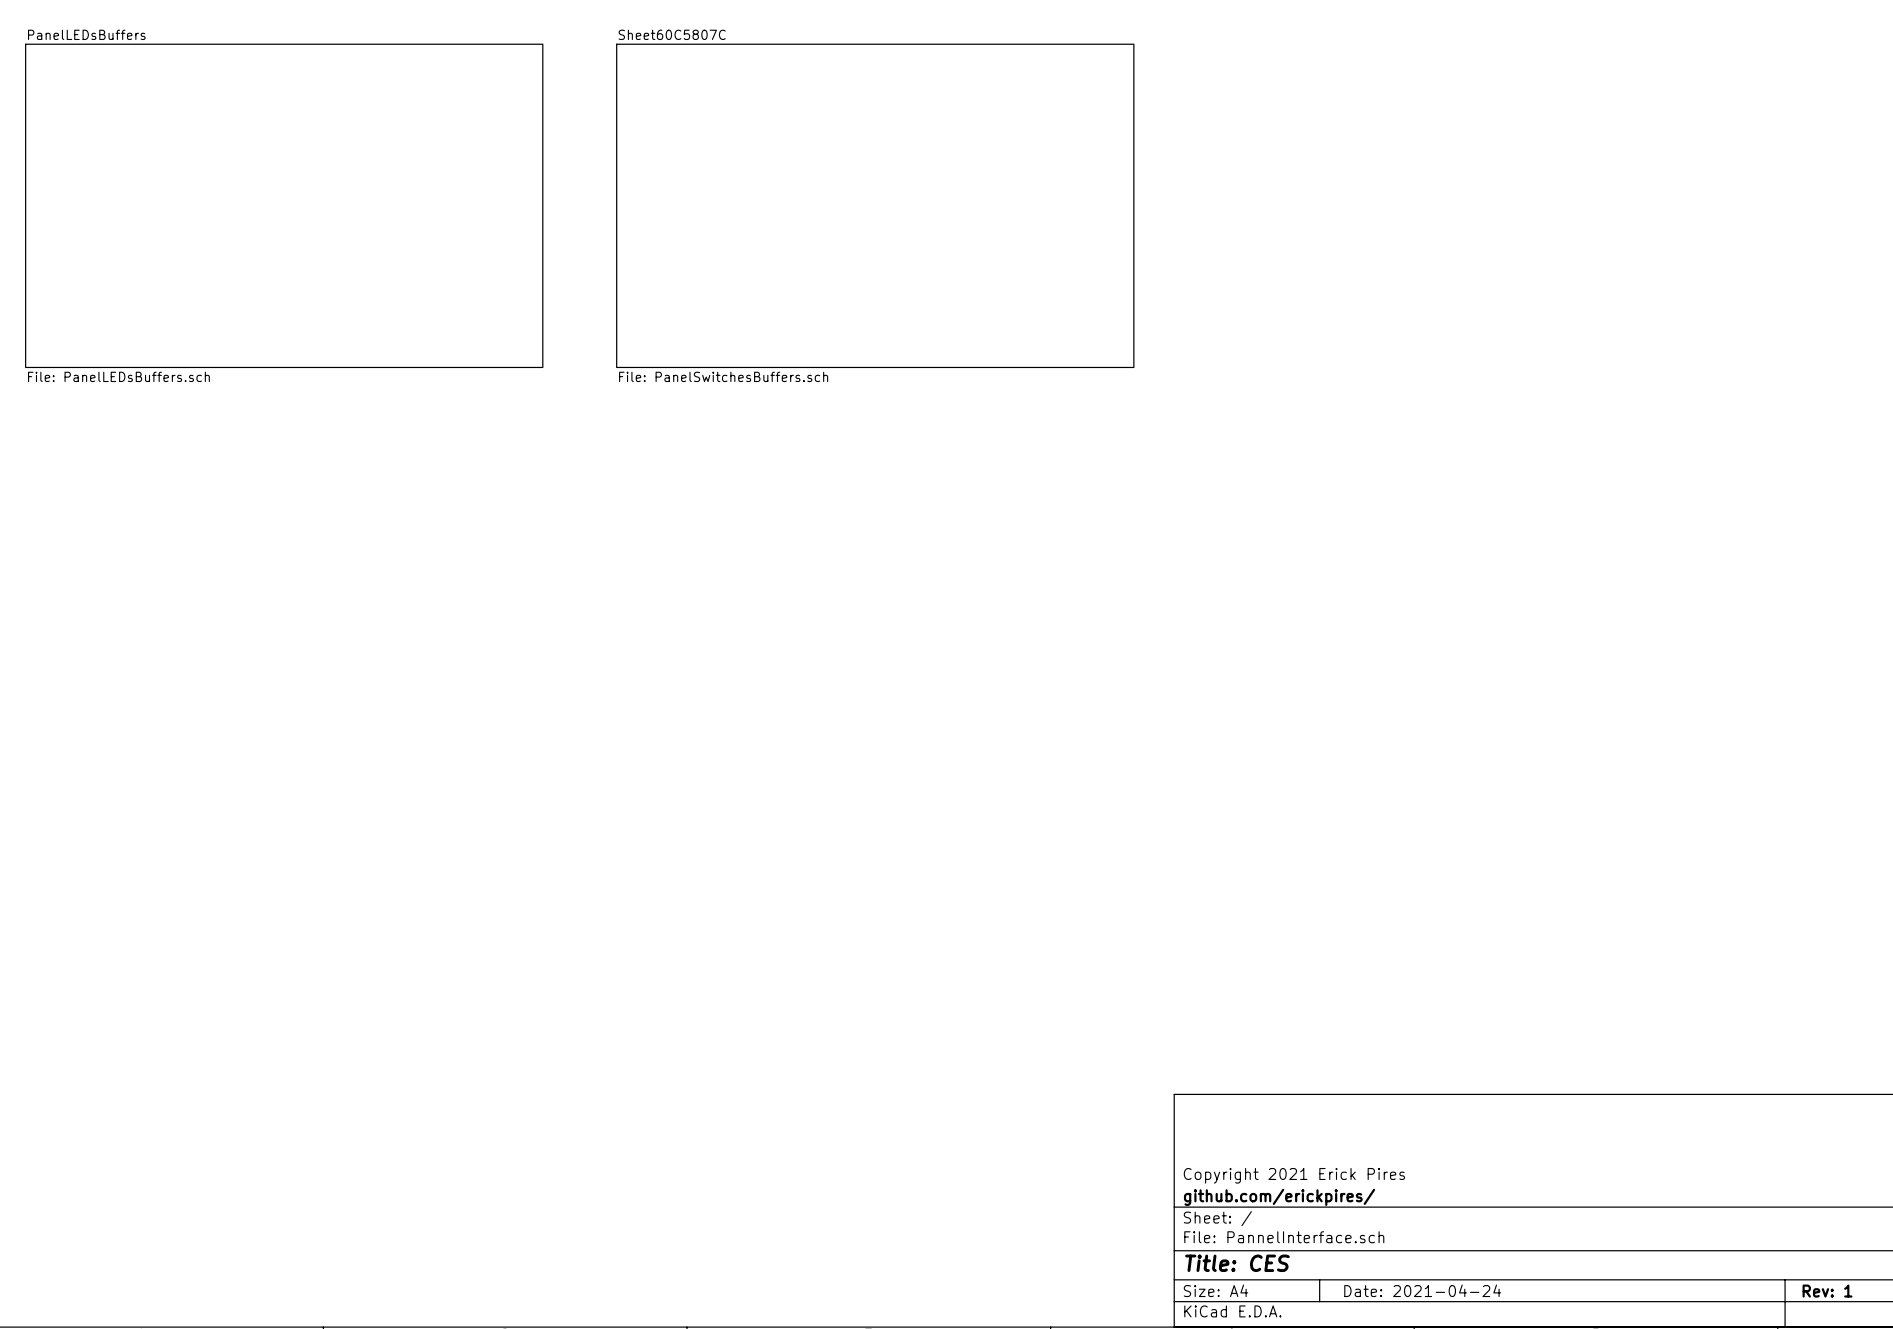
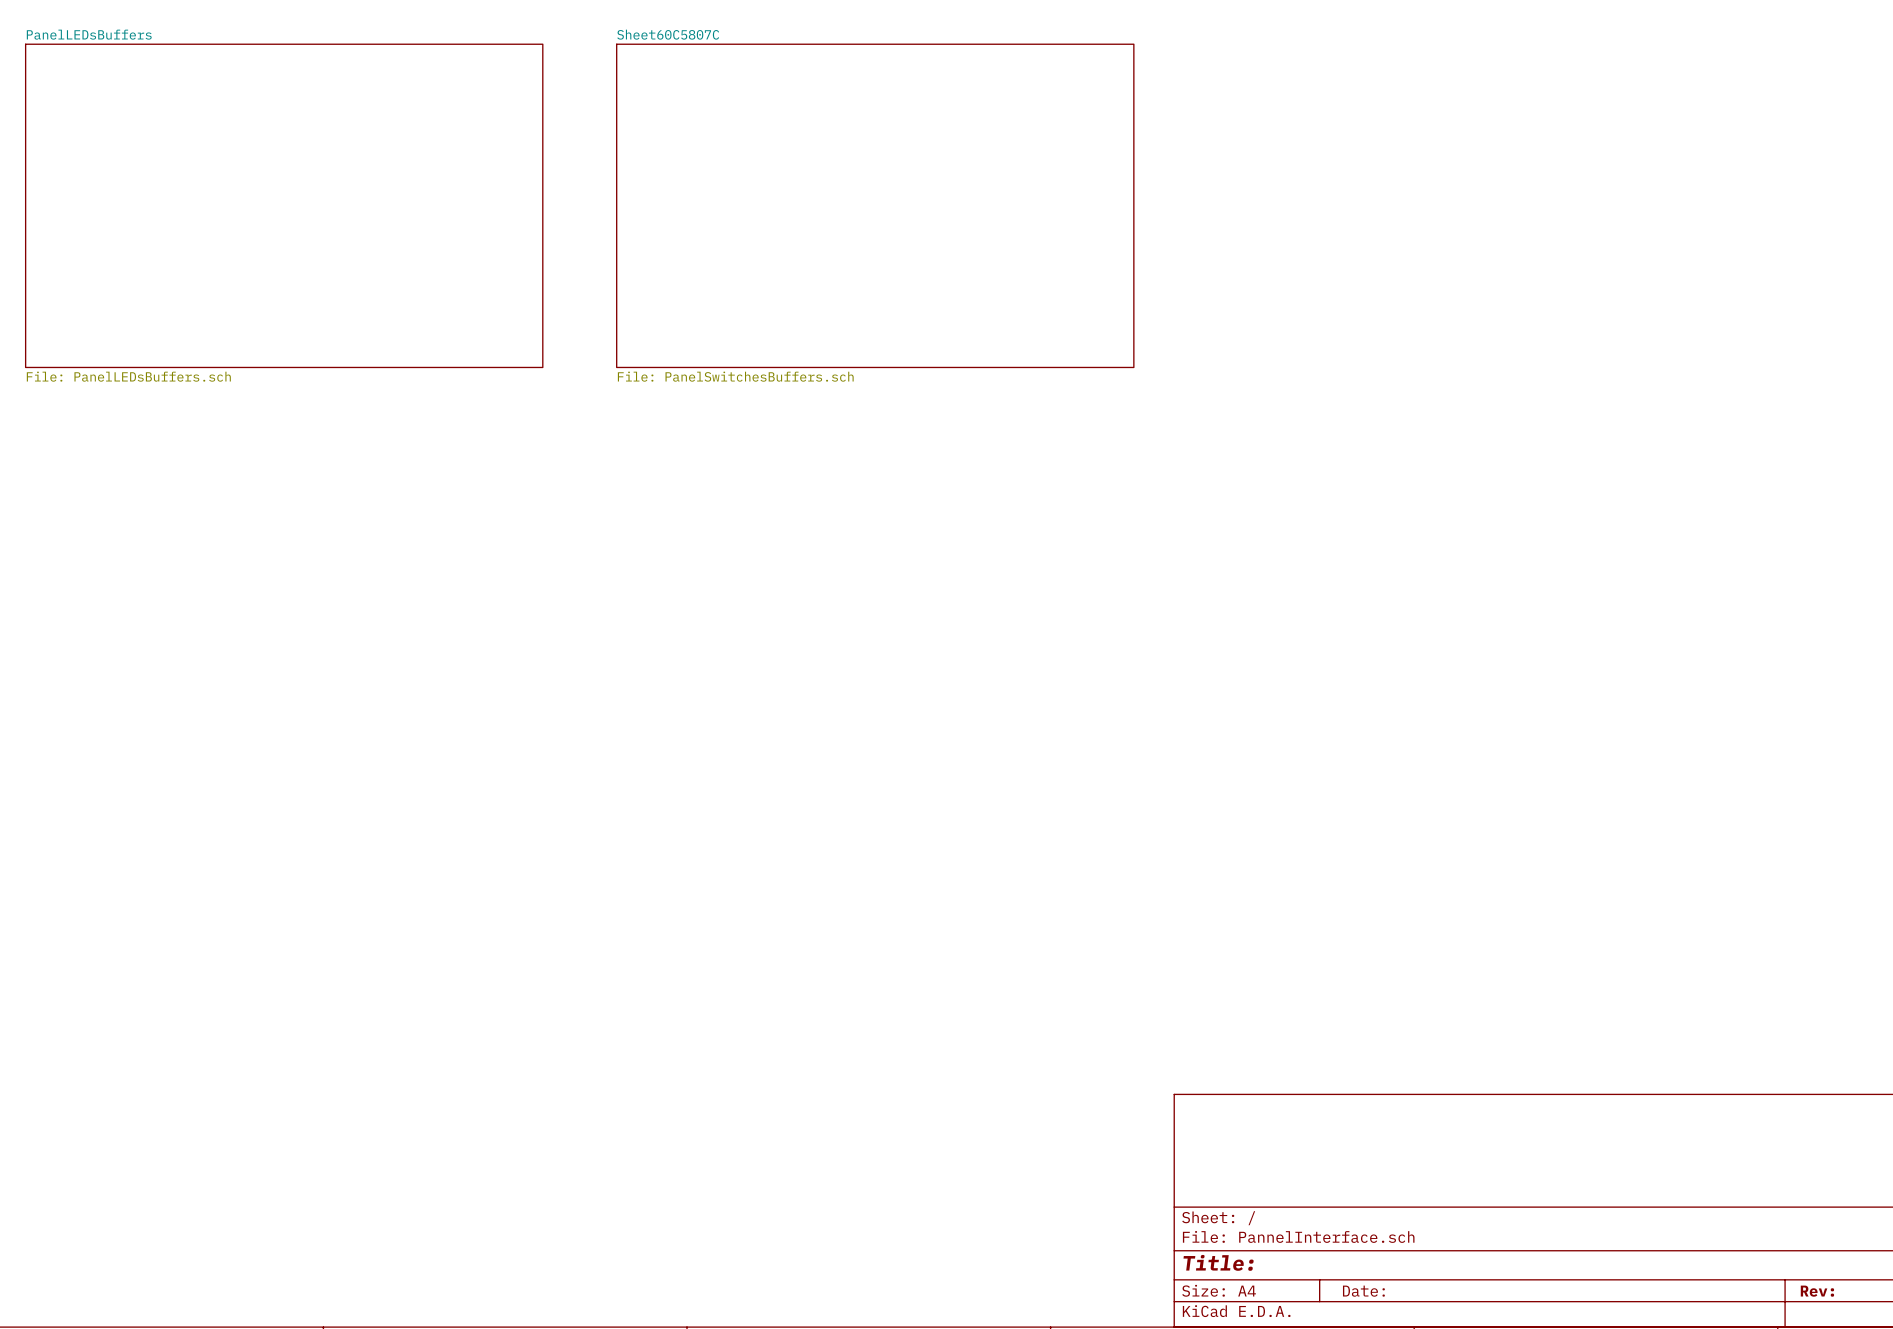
title block: Copyright 2021 Erick Pires (1294, 1175) -> none
title block: github.com/erickpires/ (1279, 1197) -> none
title block: Title: CES (1237, 1263) -> Title: (1218, 1262)
title block: Date: 2021-04-24 (1422, 1290) -> Date: (1363, 1291)
title block: Rev: 1 (1827, 1291) -> Rev: (1817, 1291)

